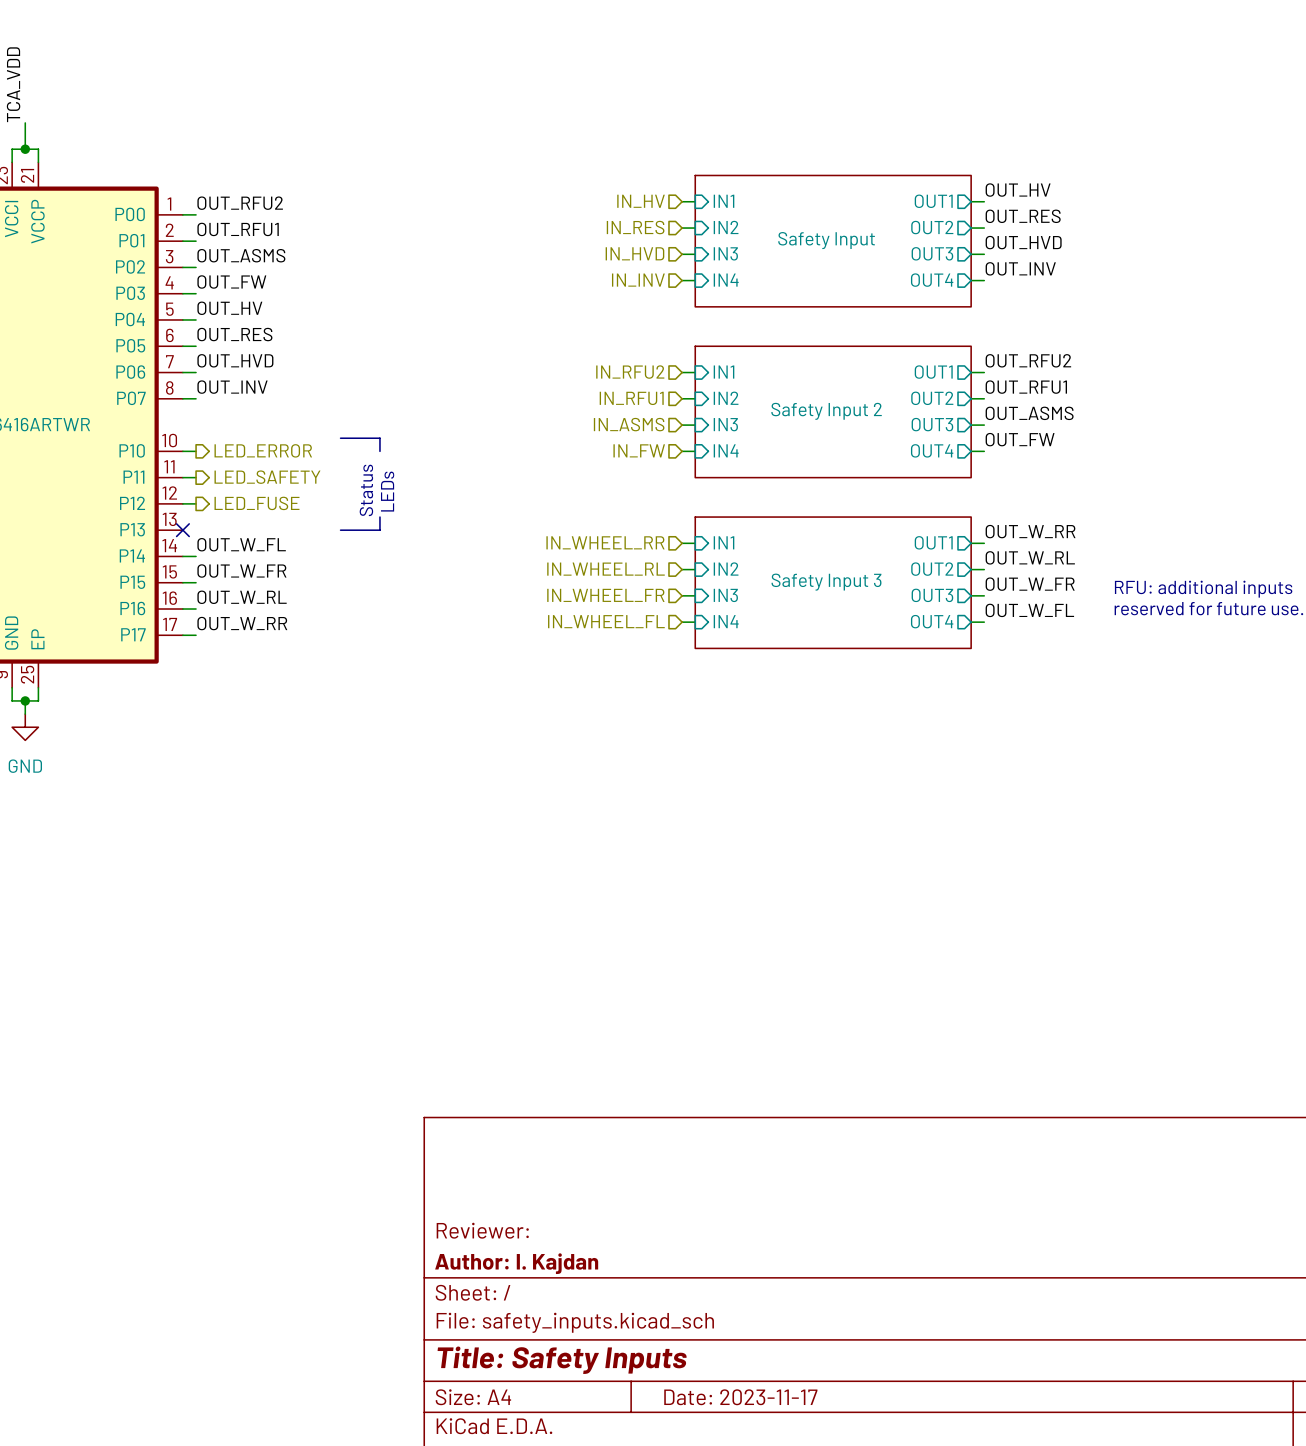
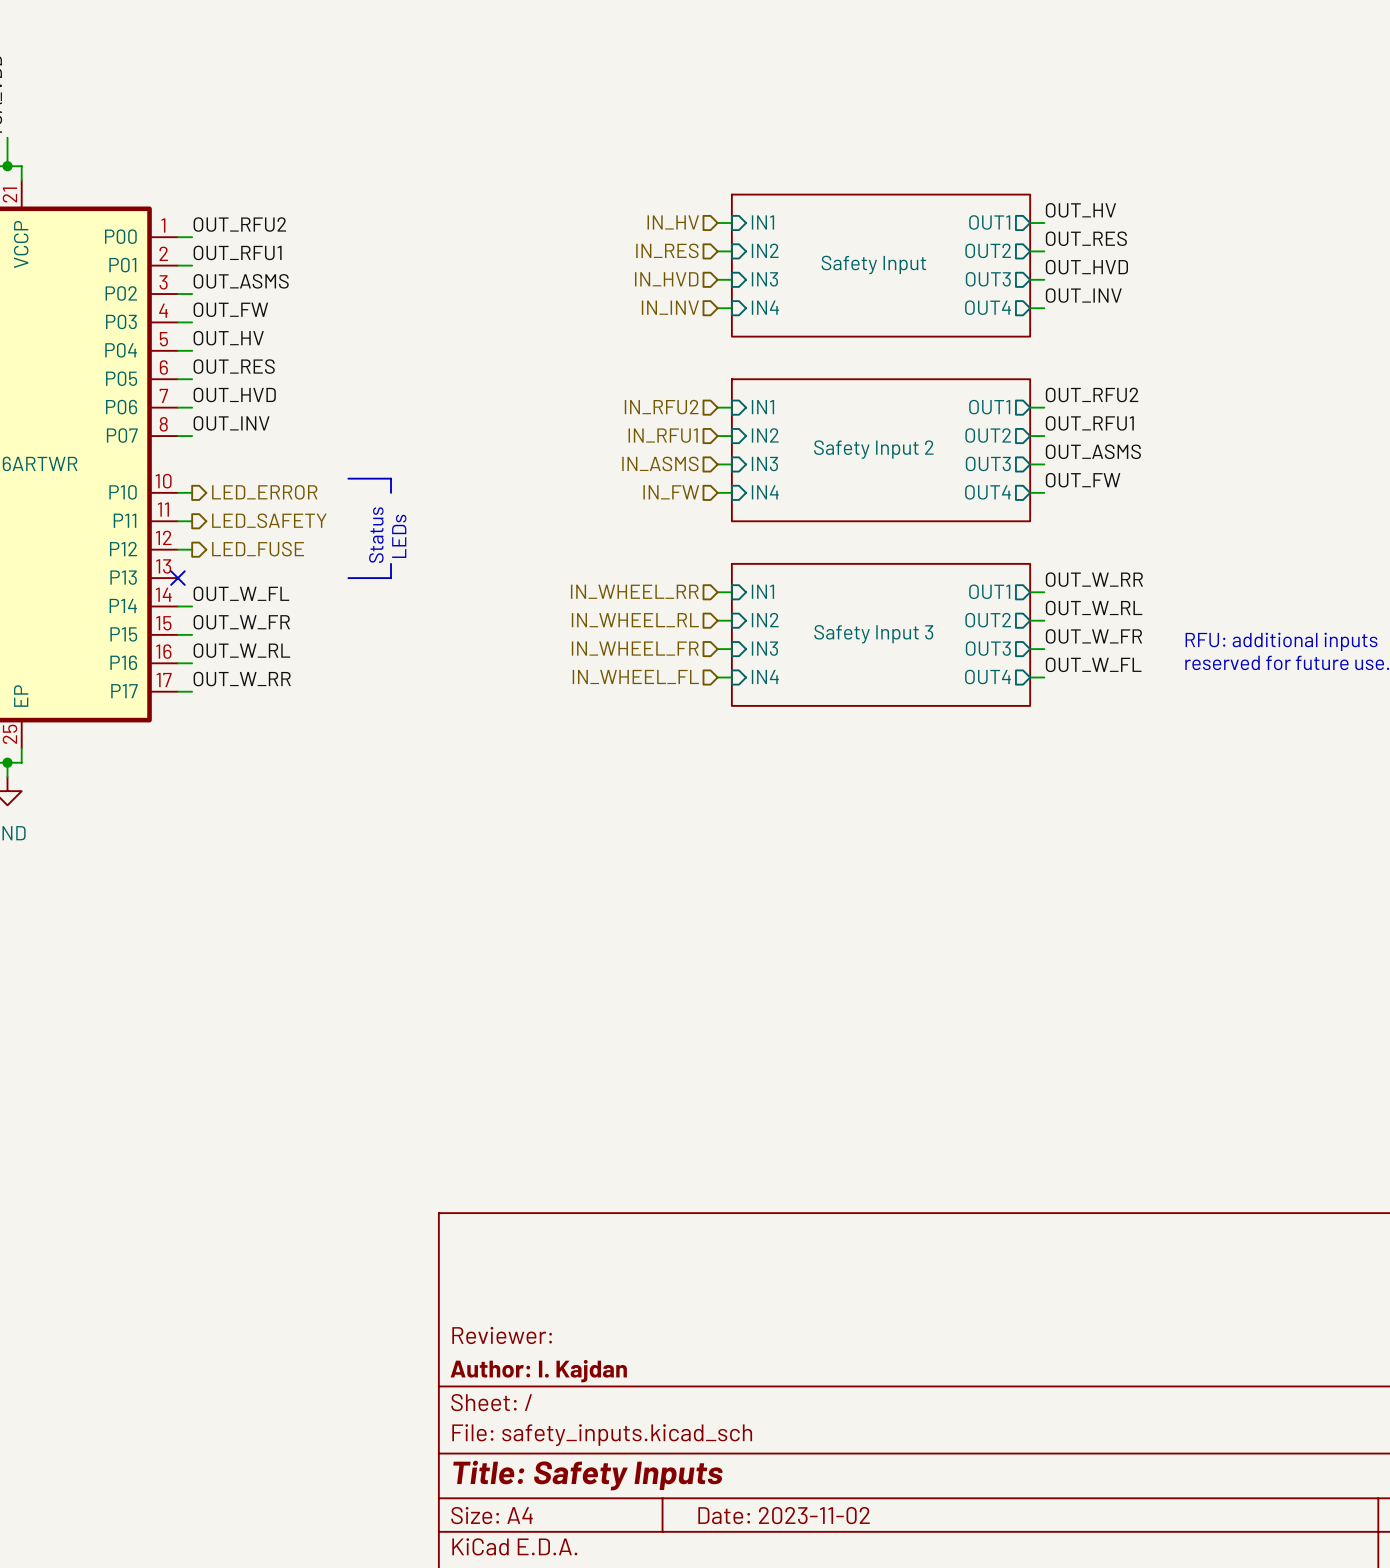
title block: Date: 2023-11-17 (740, 1397) -> Date: 2023-11-02 (784, 1515)

